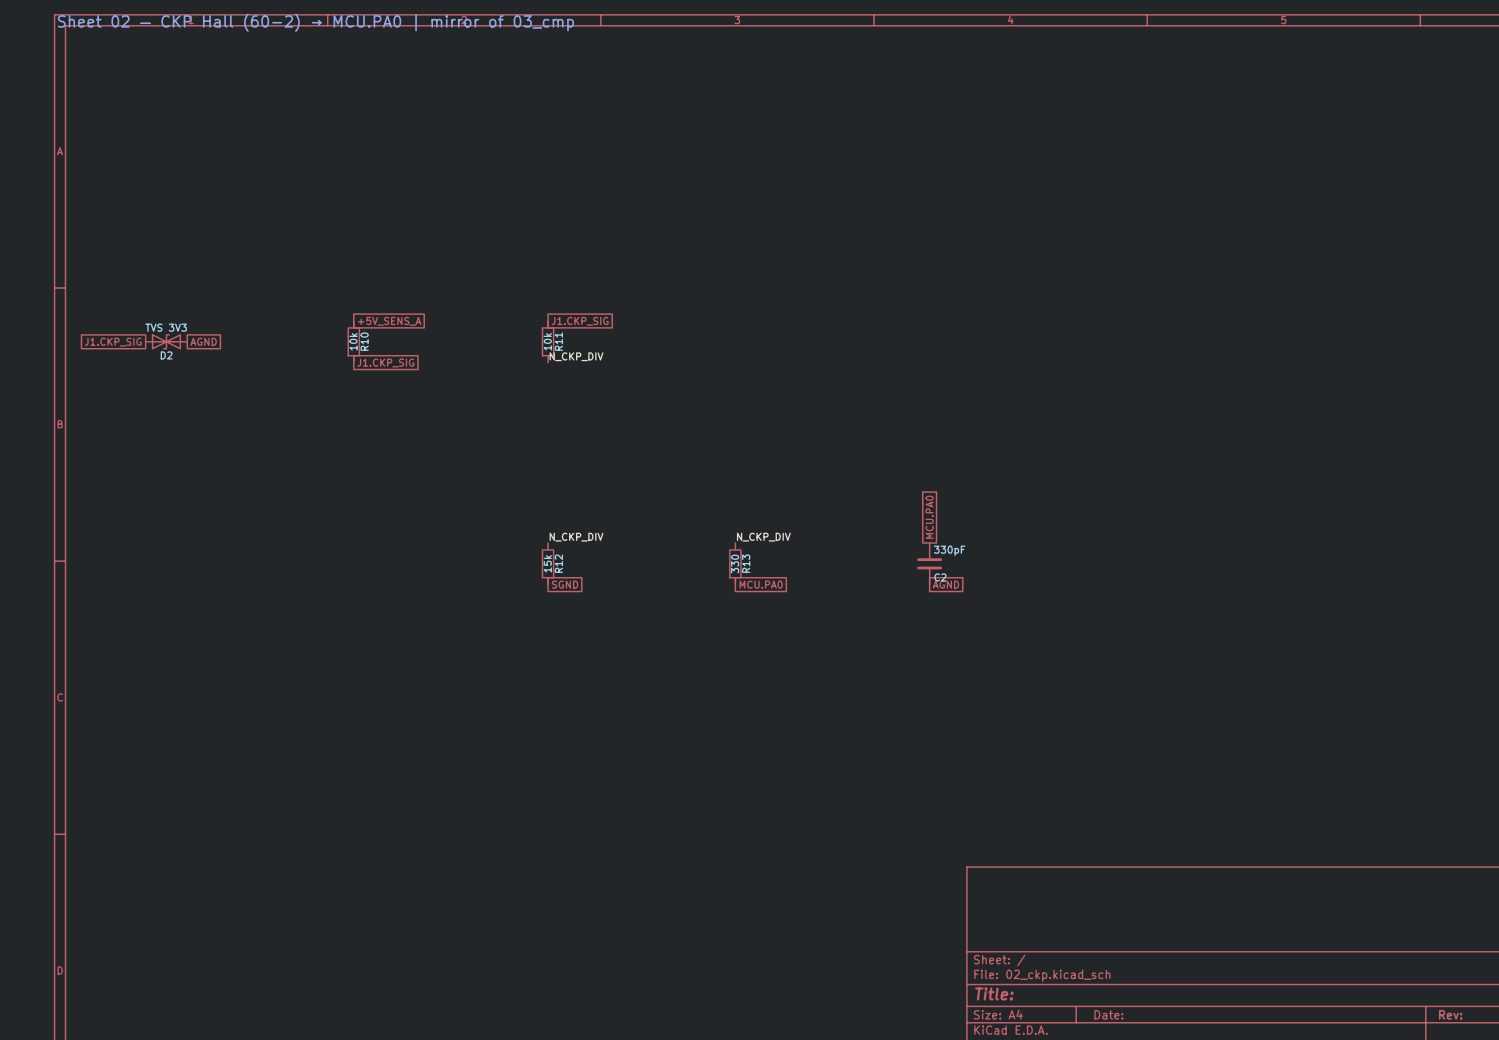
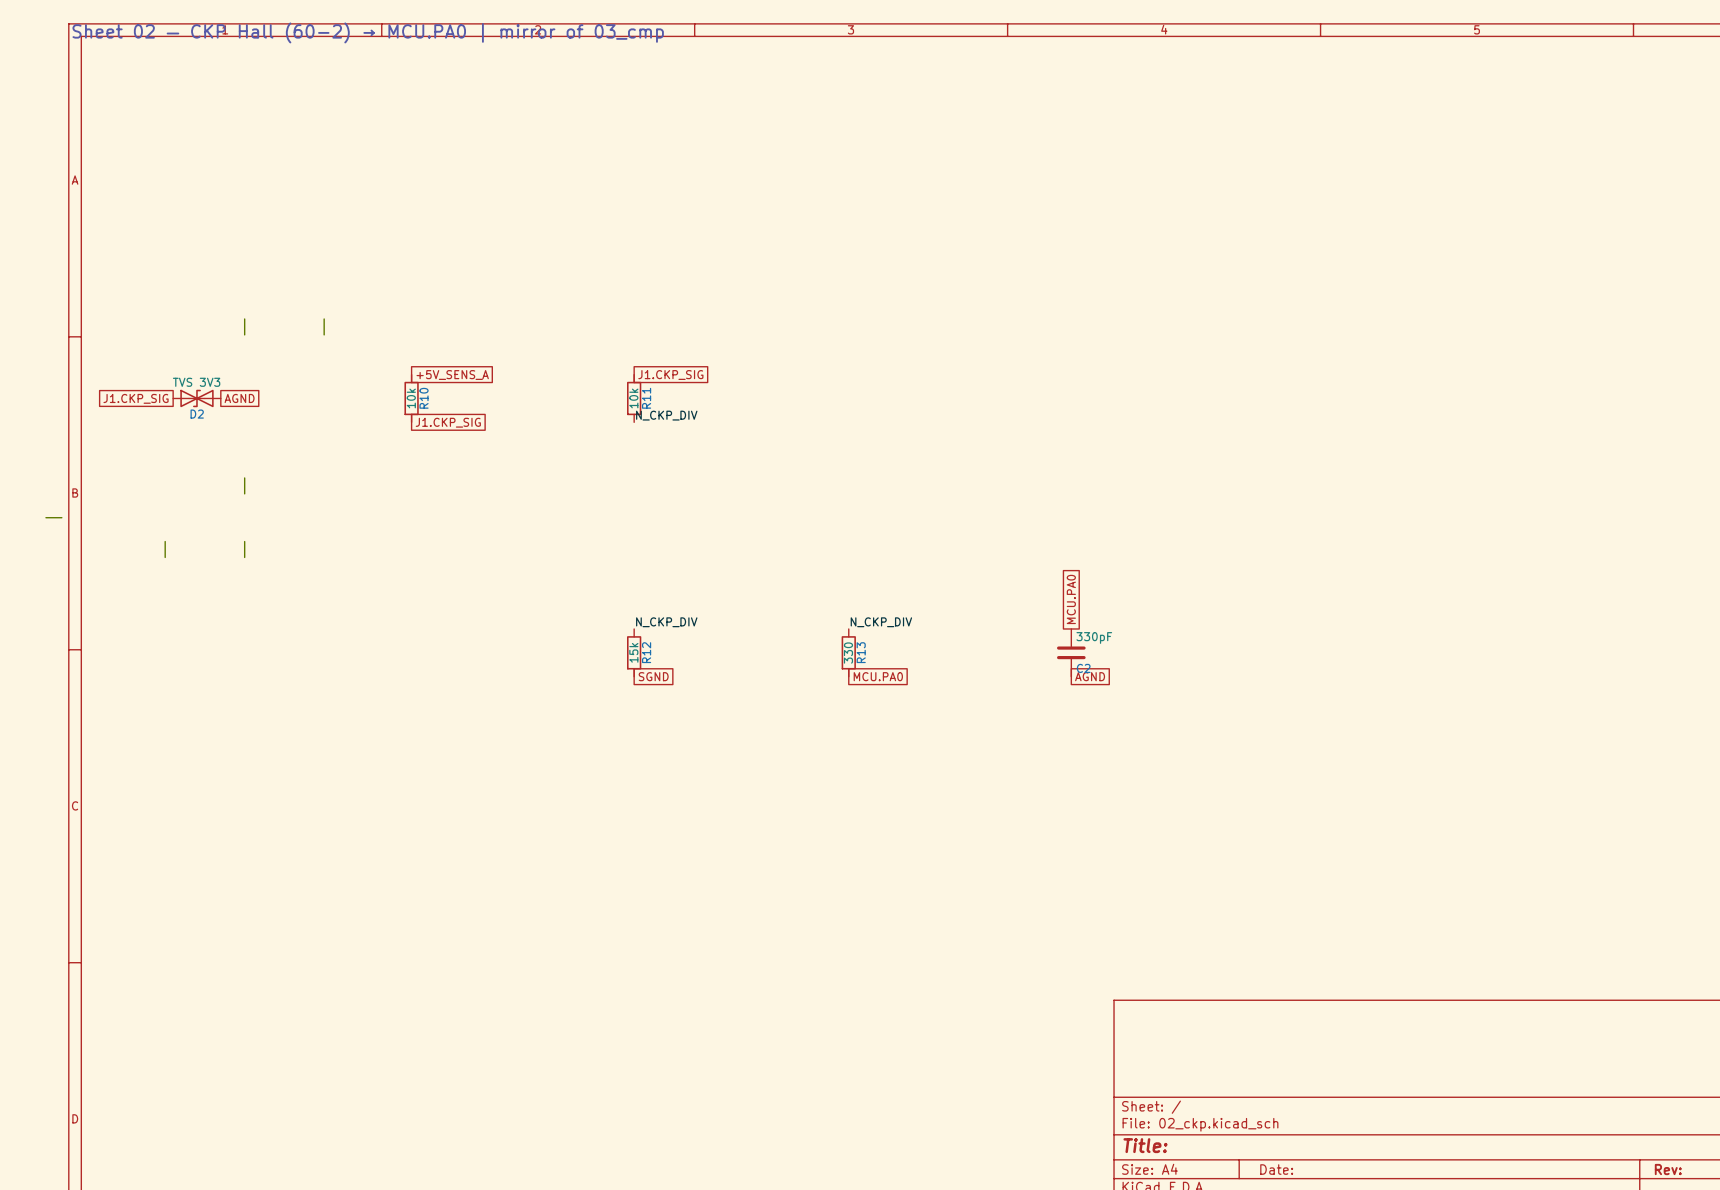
wire: none -> (244, 318) (244, 334)
wire: none -> (324, 318) (324, 334)
wire: none -> (244, 477) (244, 493)
wire: none -> (45, 517) (61, 517)
wire: none -> (165, 541) (165, 557)
wire: none -> (244, 541) (244, 557)

